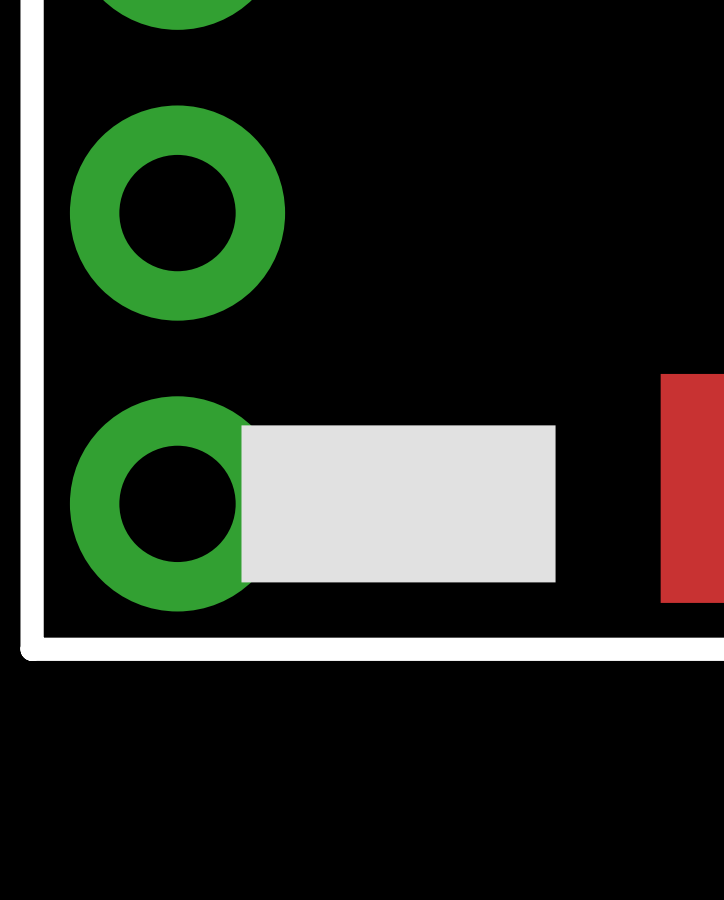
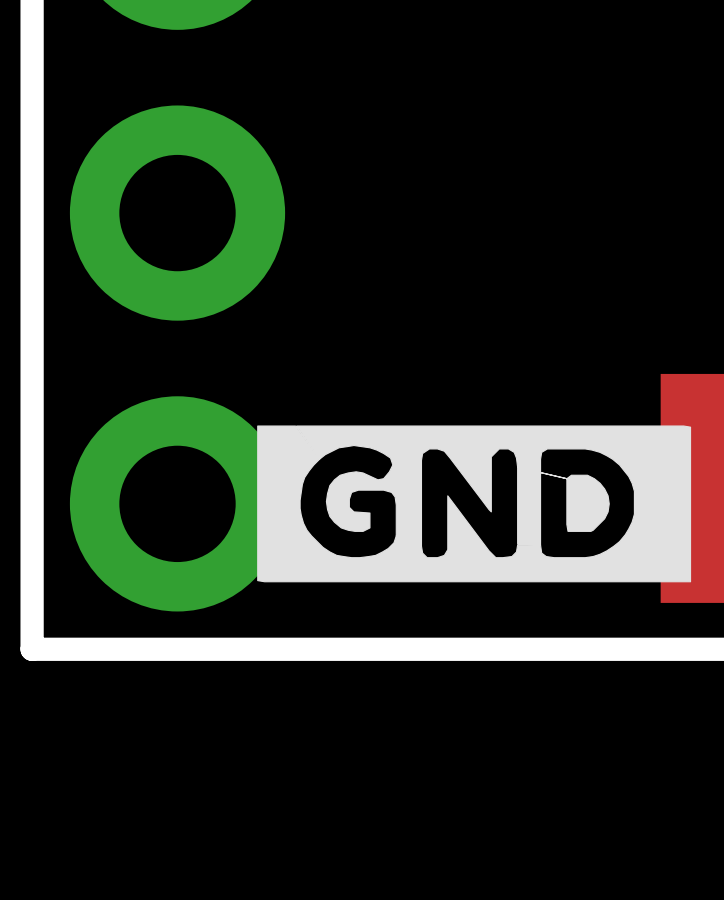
drawing shape: [241, 425, 556, 583] -> [257, 425, 692, 583]

